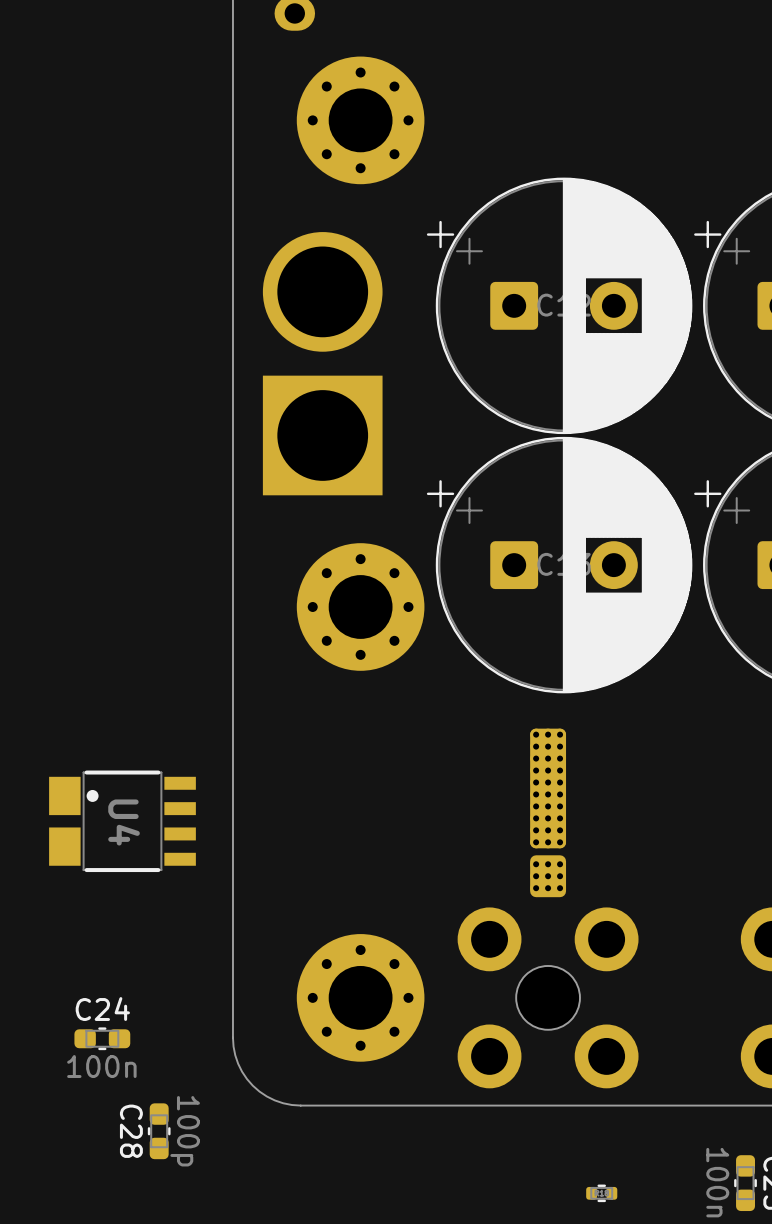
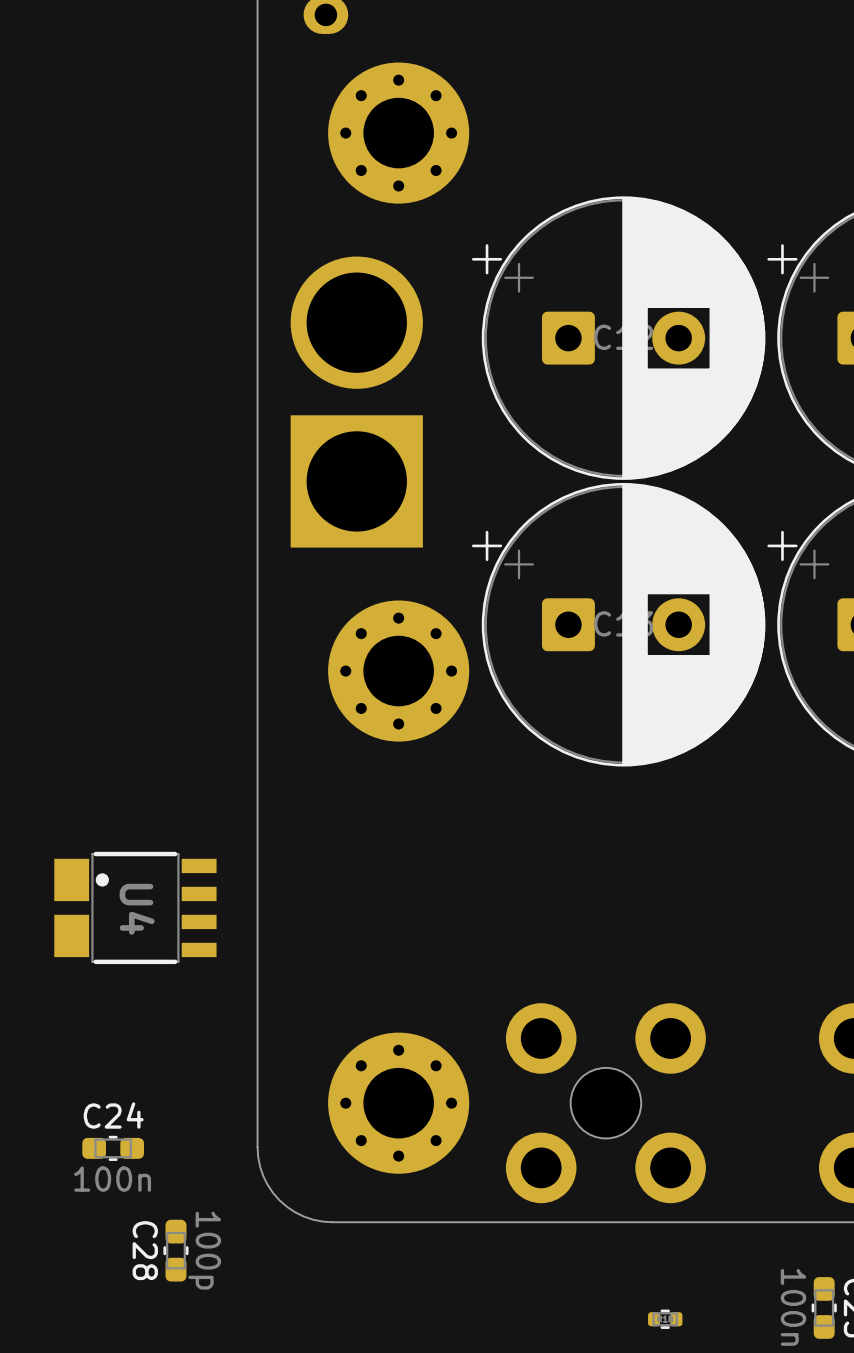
part: (548, 812) -> none

